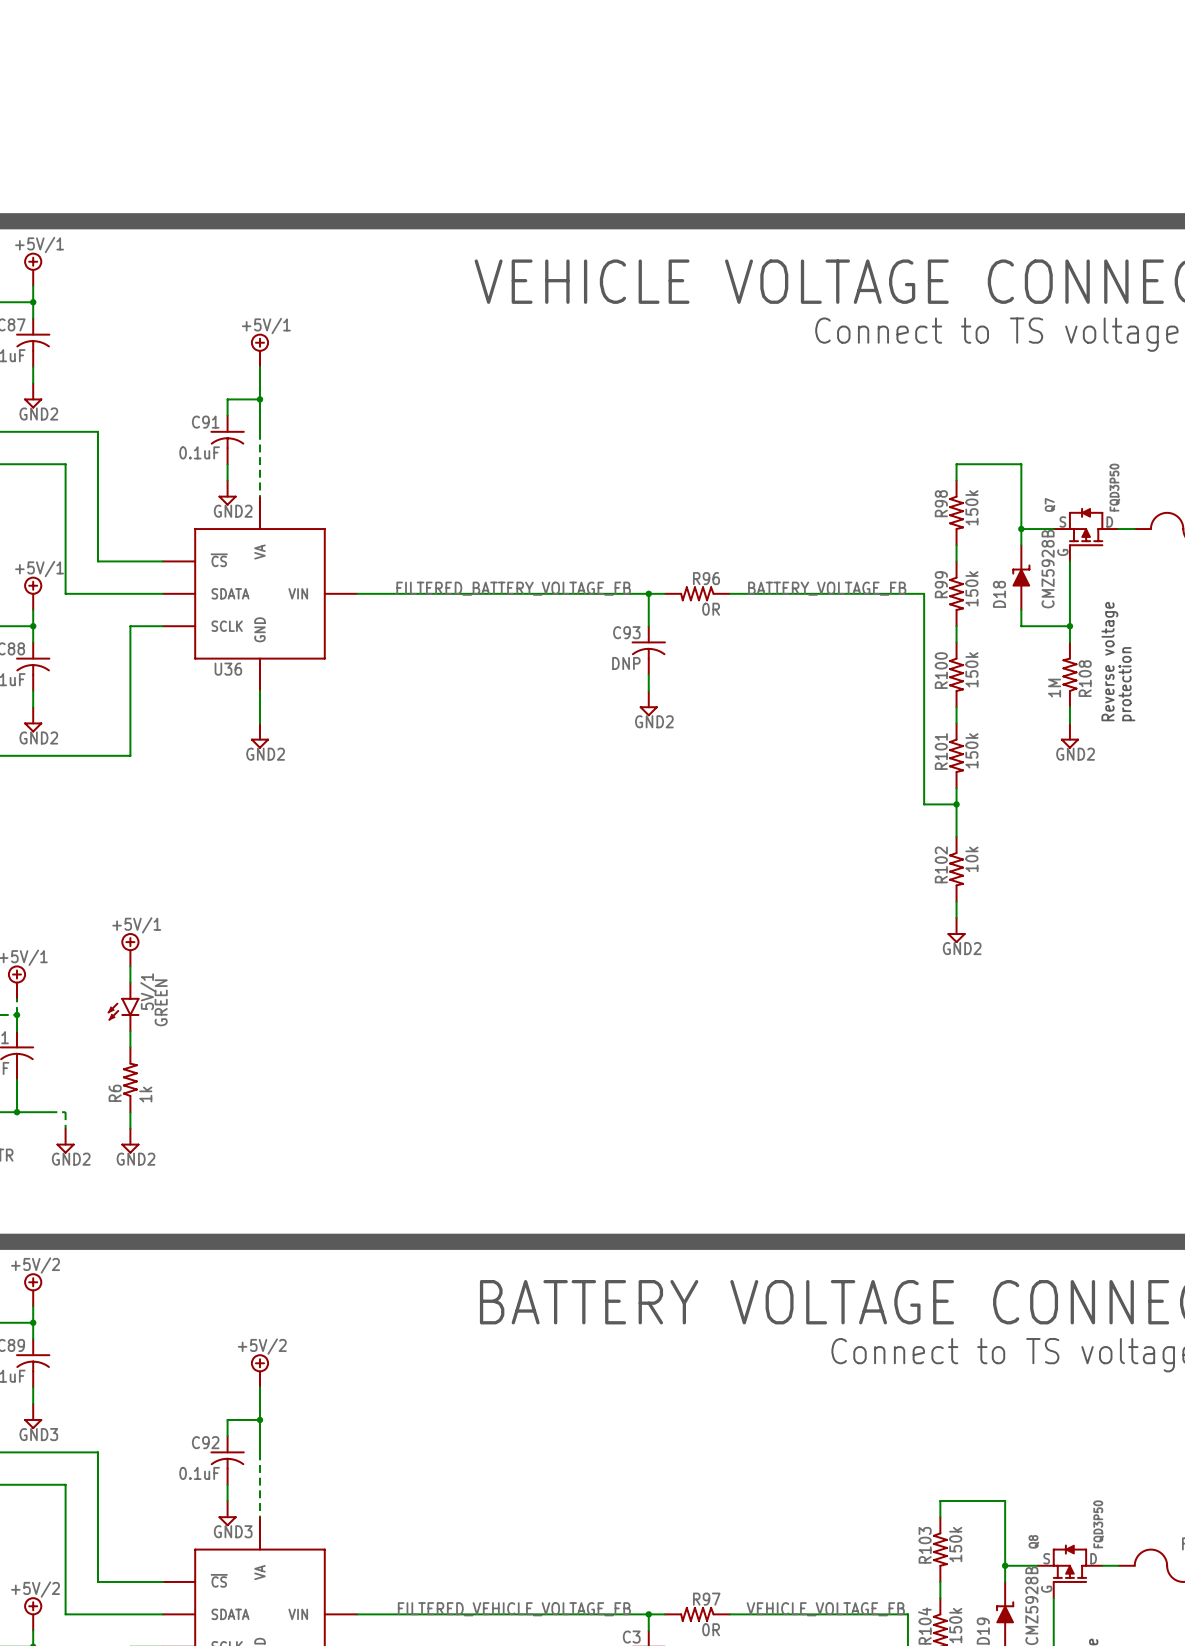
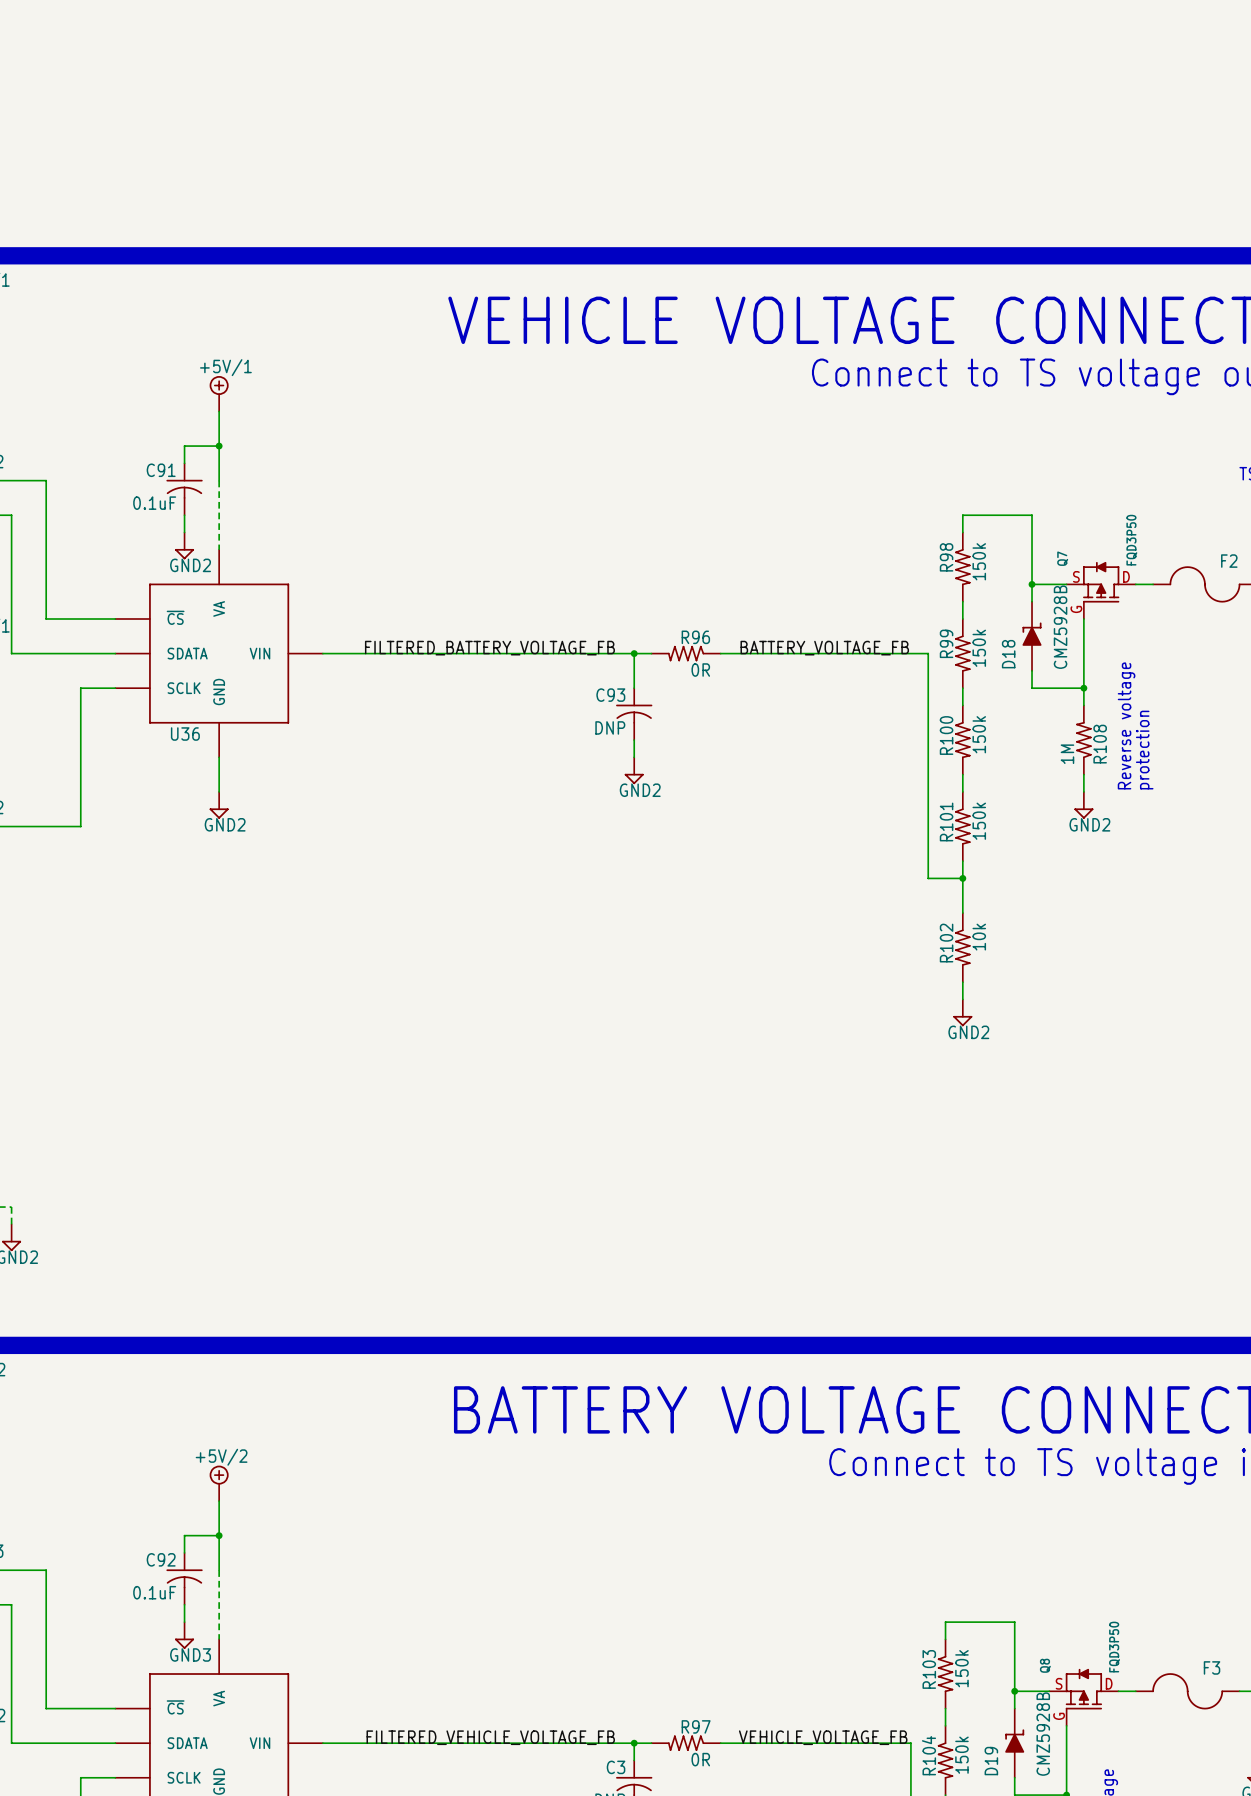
power symbol: +5V/1 (130, 949) -> none
wire: (130, 966) (130, 982) -> none
5V/1: GREEN (123, 1006) -> none
wire: (130, 1031) (130, 1047) -> none
R6: 1k (130, 1079) -> none
wire: (130, 1112) (130, 1128) -> none
power symbol: GND2 (130, 1140) -> none

